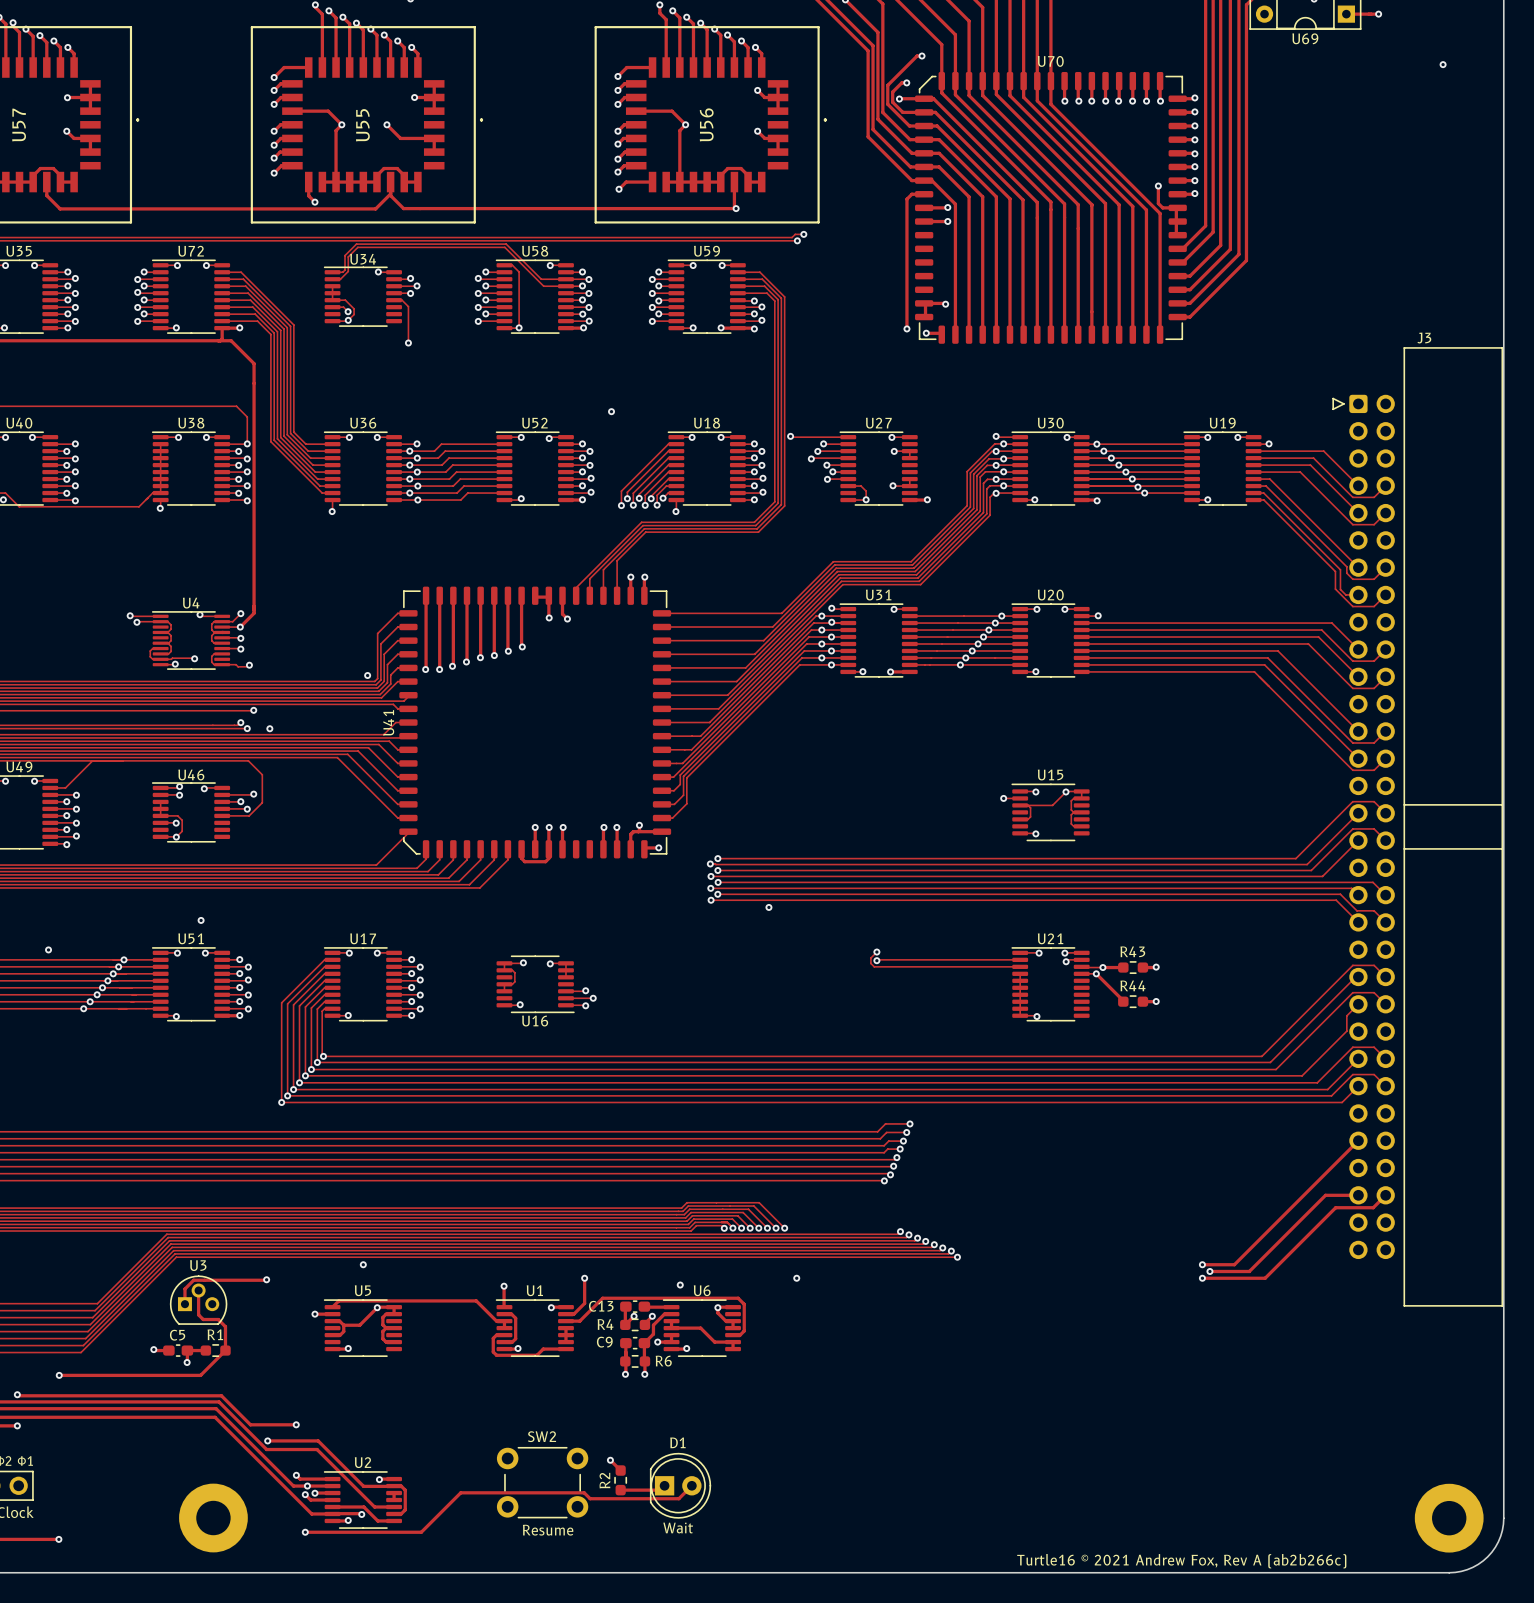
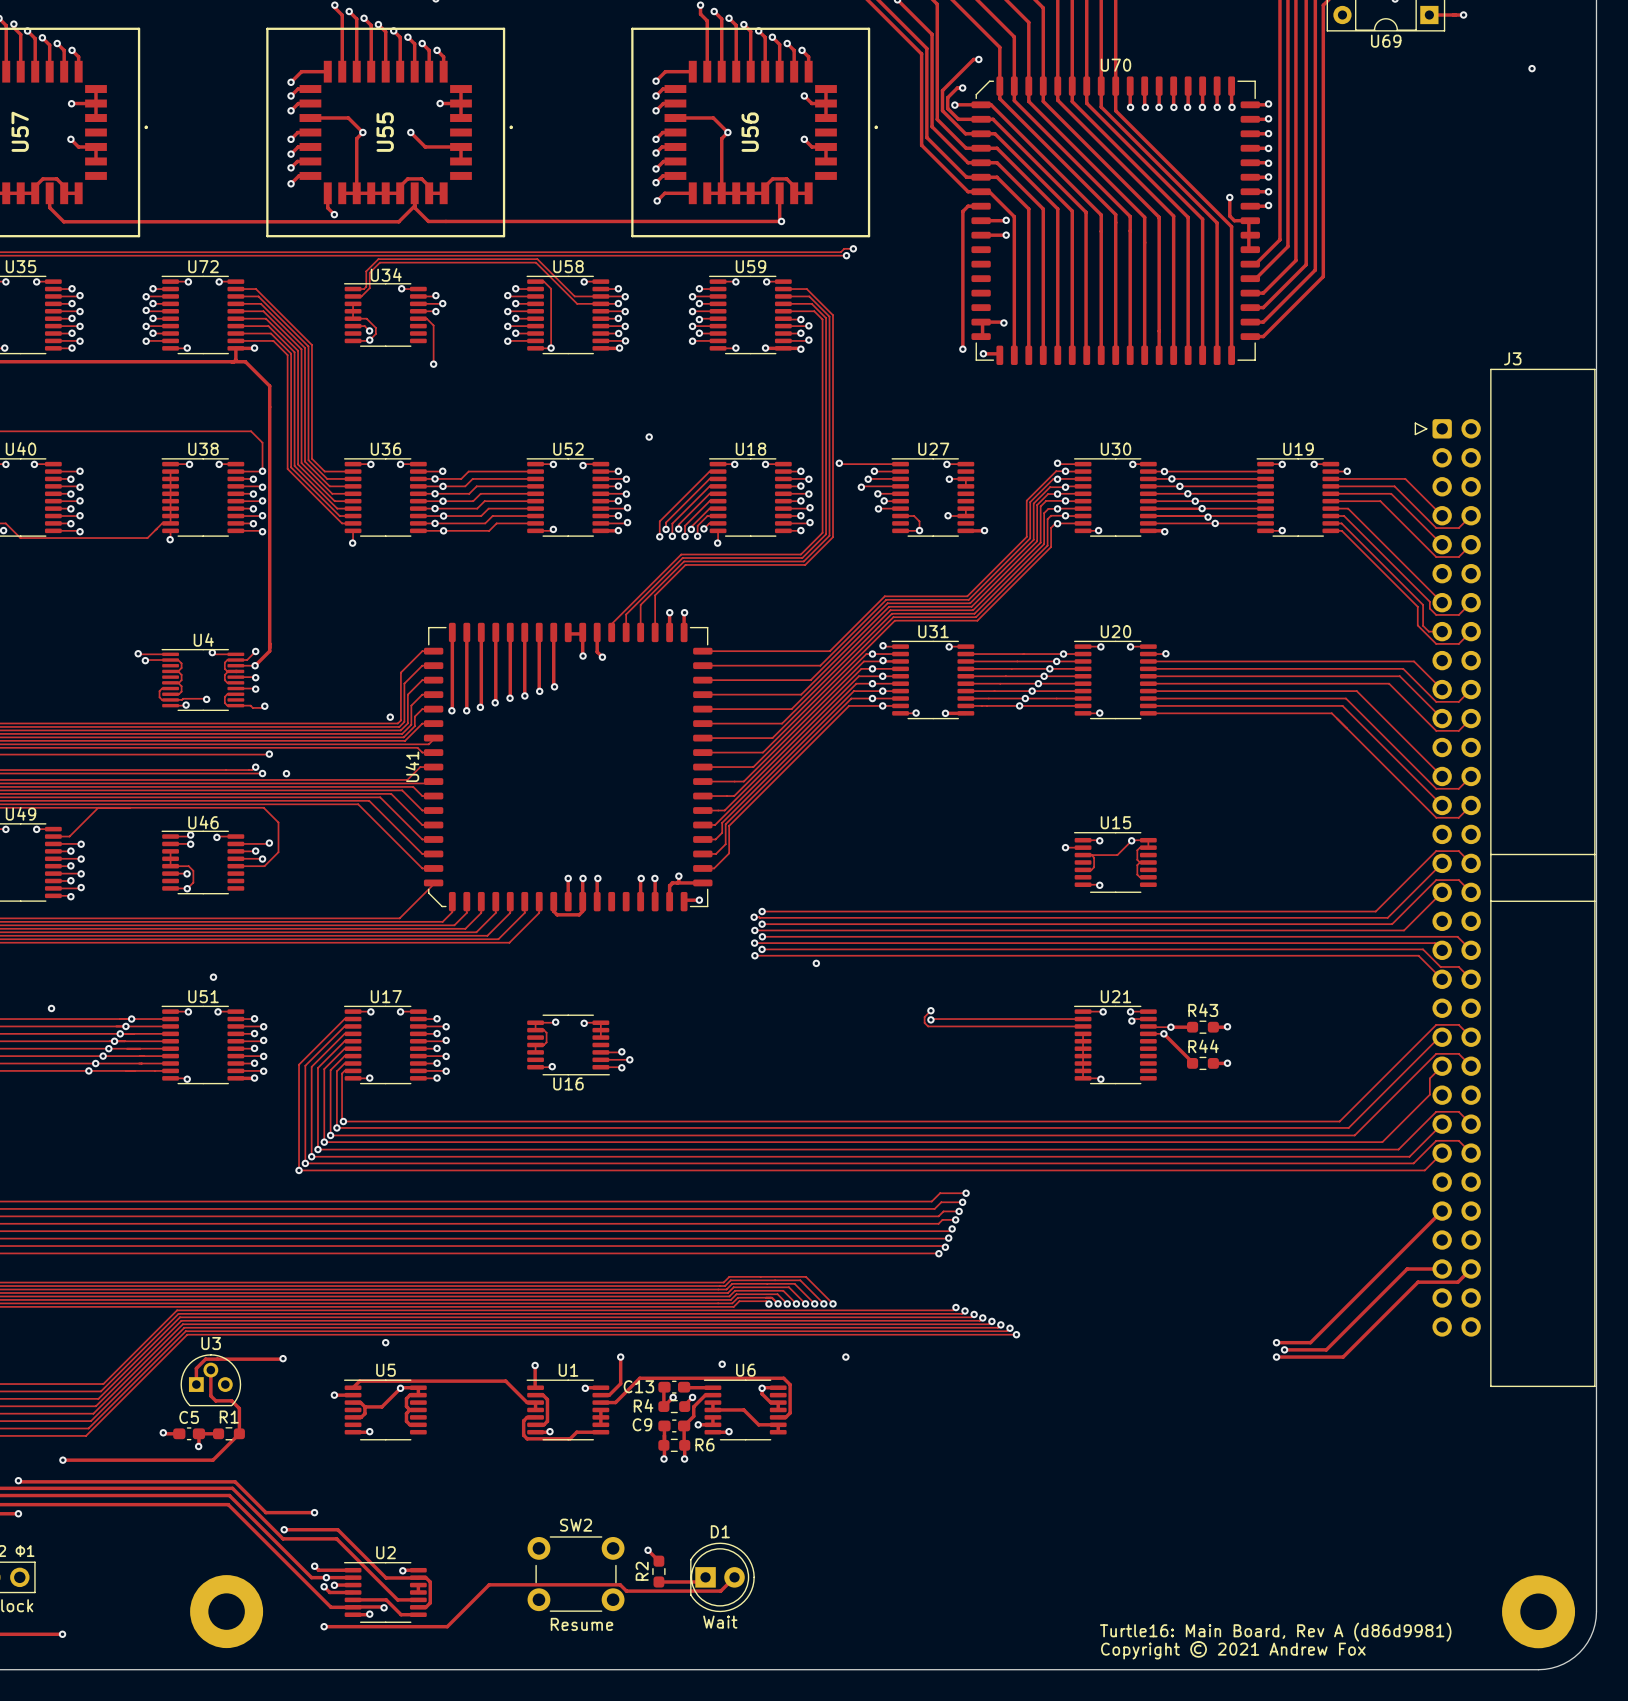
text: none -> Turtle16: Main Board, Rev A (d86d9981) (1275, 1632)
text: none -> Copyright © 2021 Andrew Fox (1233, 1650)
text: Turtle16 © 2021 Andrew Fox, Rev A (ab2b266c) (1181, 1561) -> none

